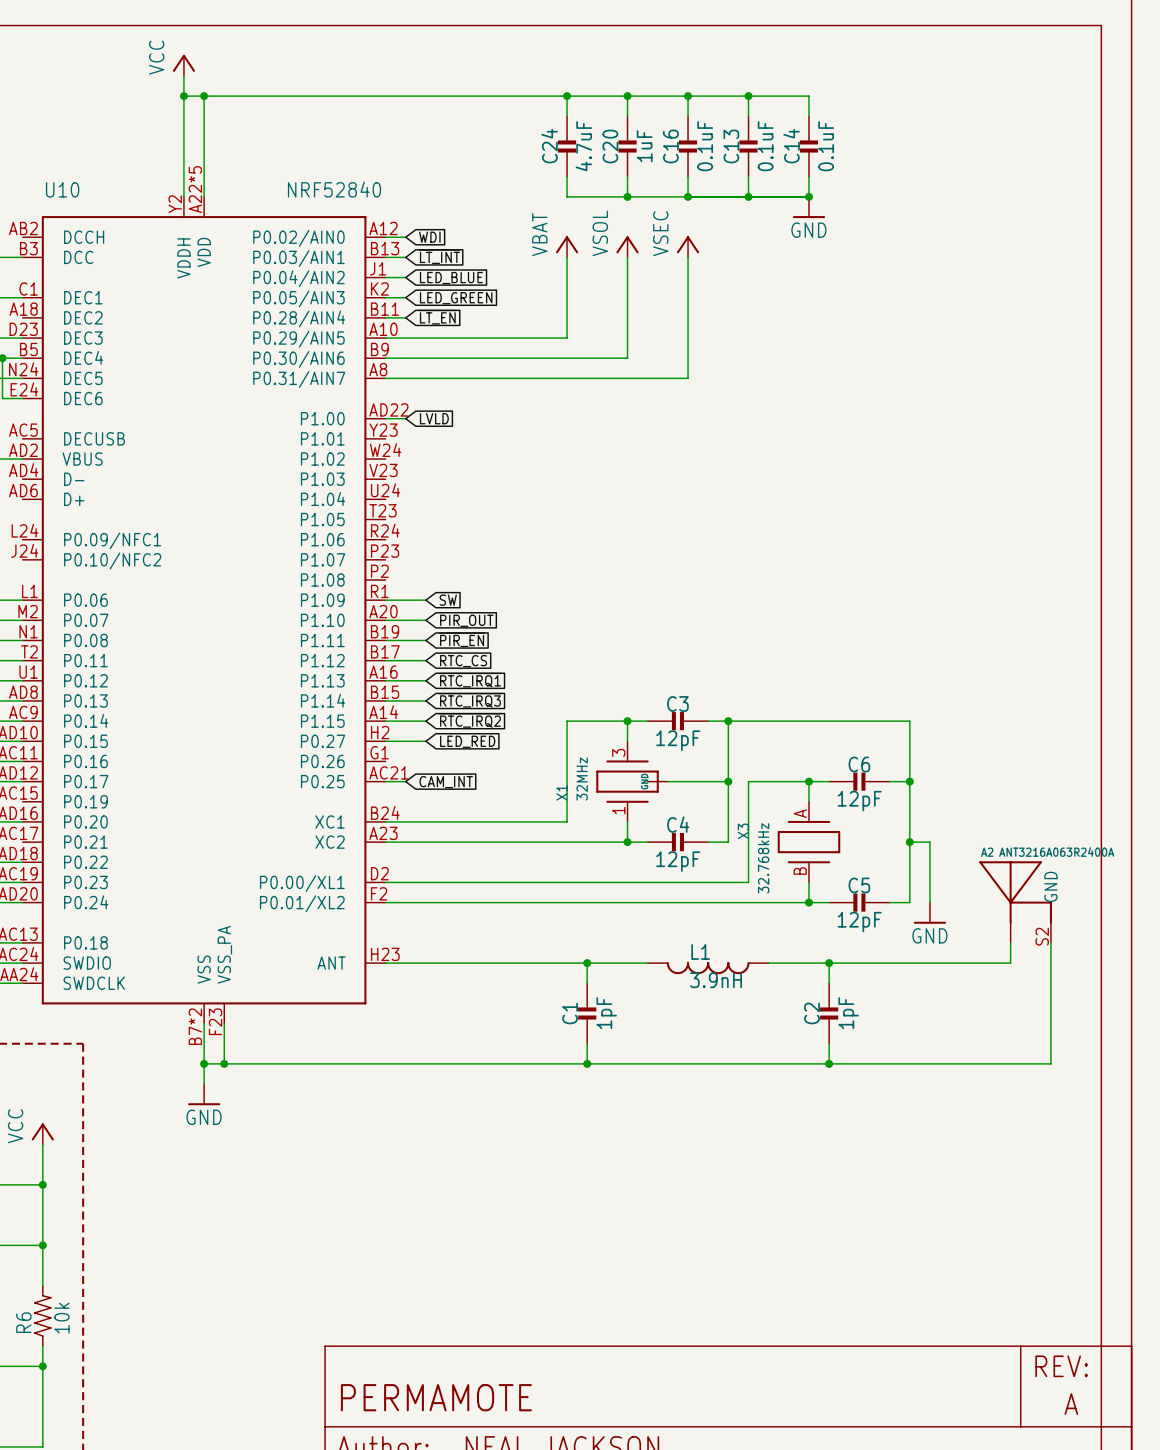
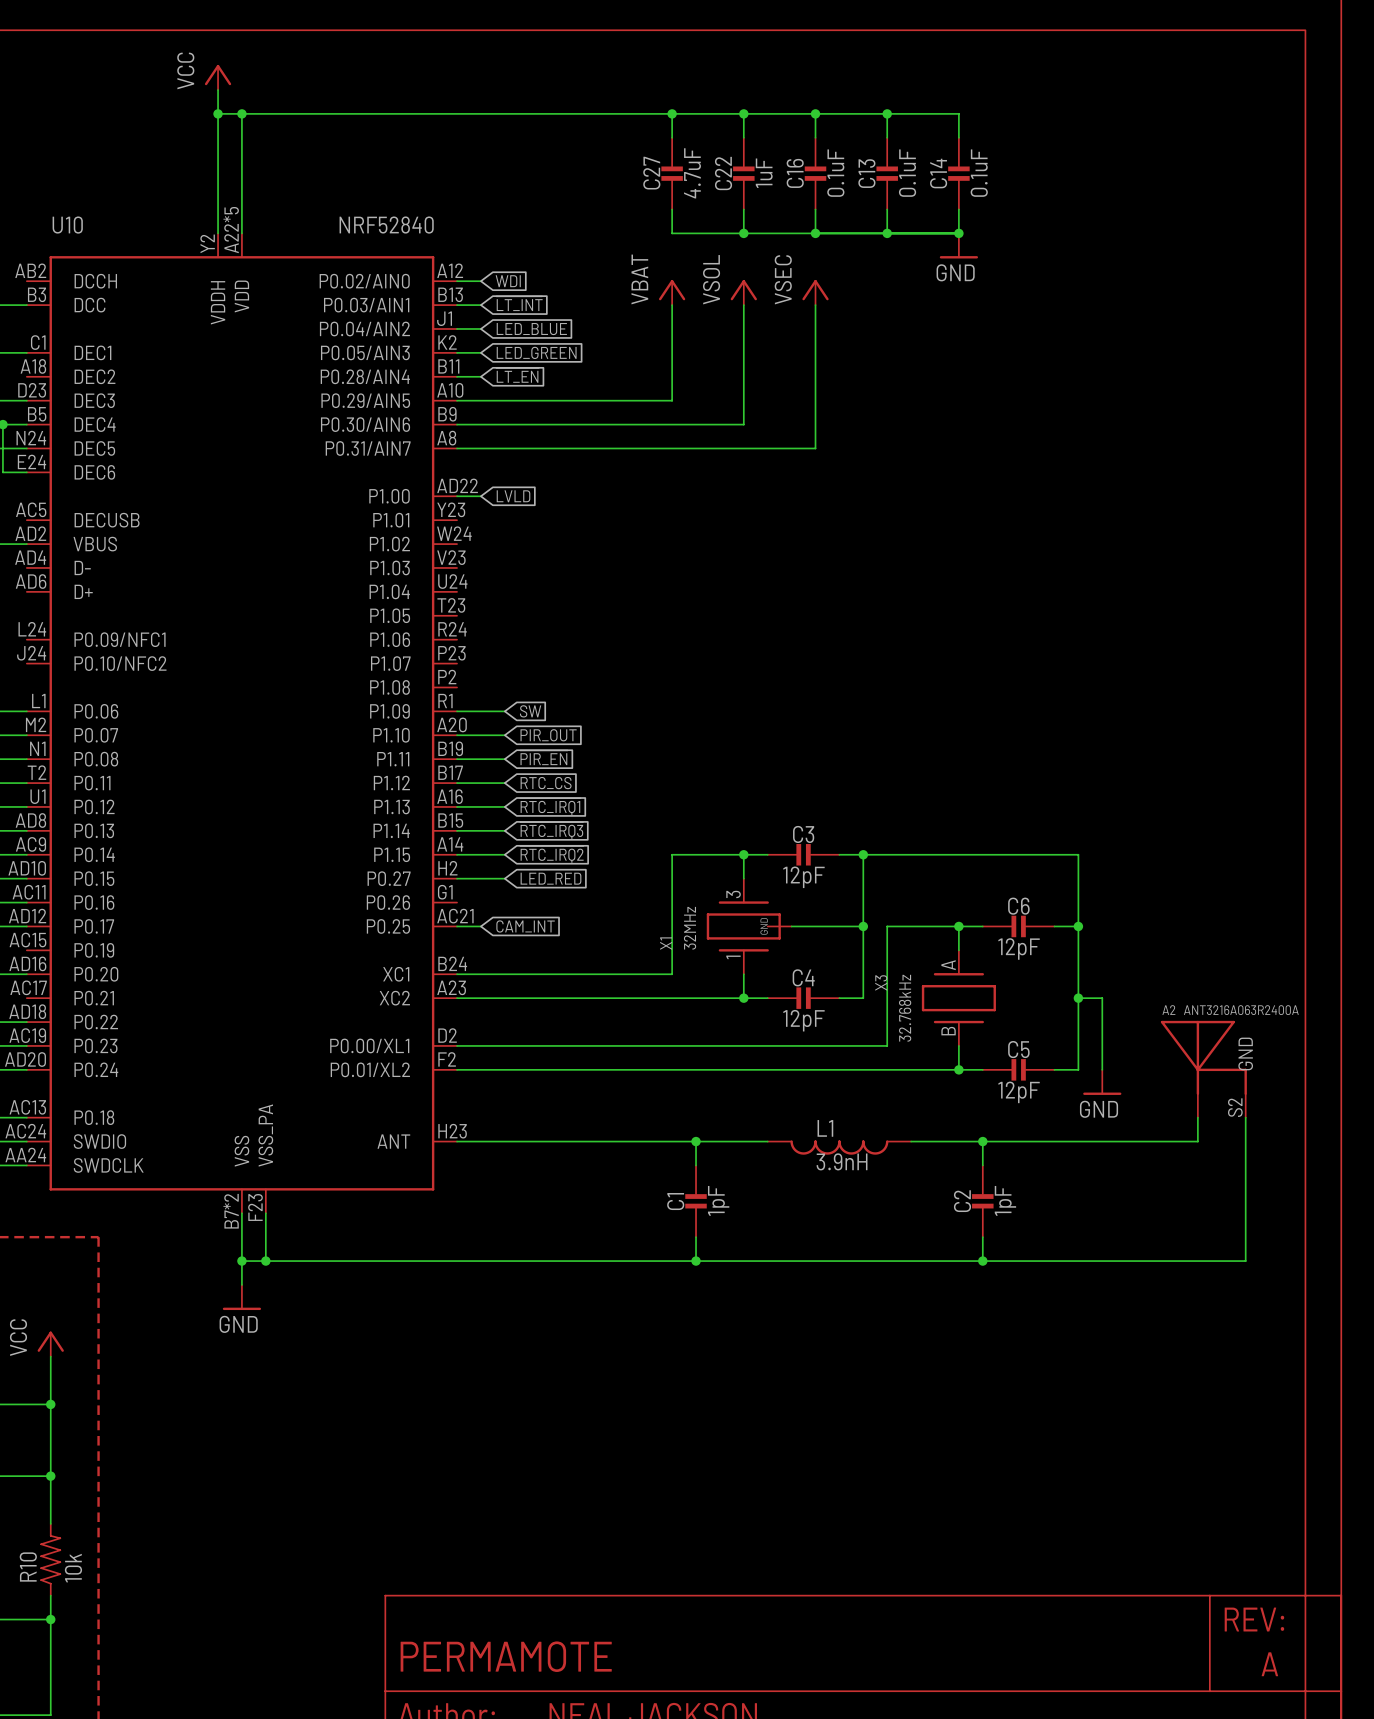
C24 name: C24 (549, 146) -> C27 (651, 173)
C20 name: C20 (610, 146) -> C22 (723, 173)
R6 name: R6 (23, 1322) -> R10 (28, 1567)

